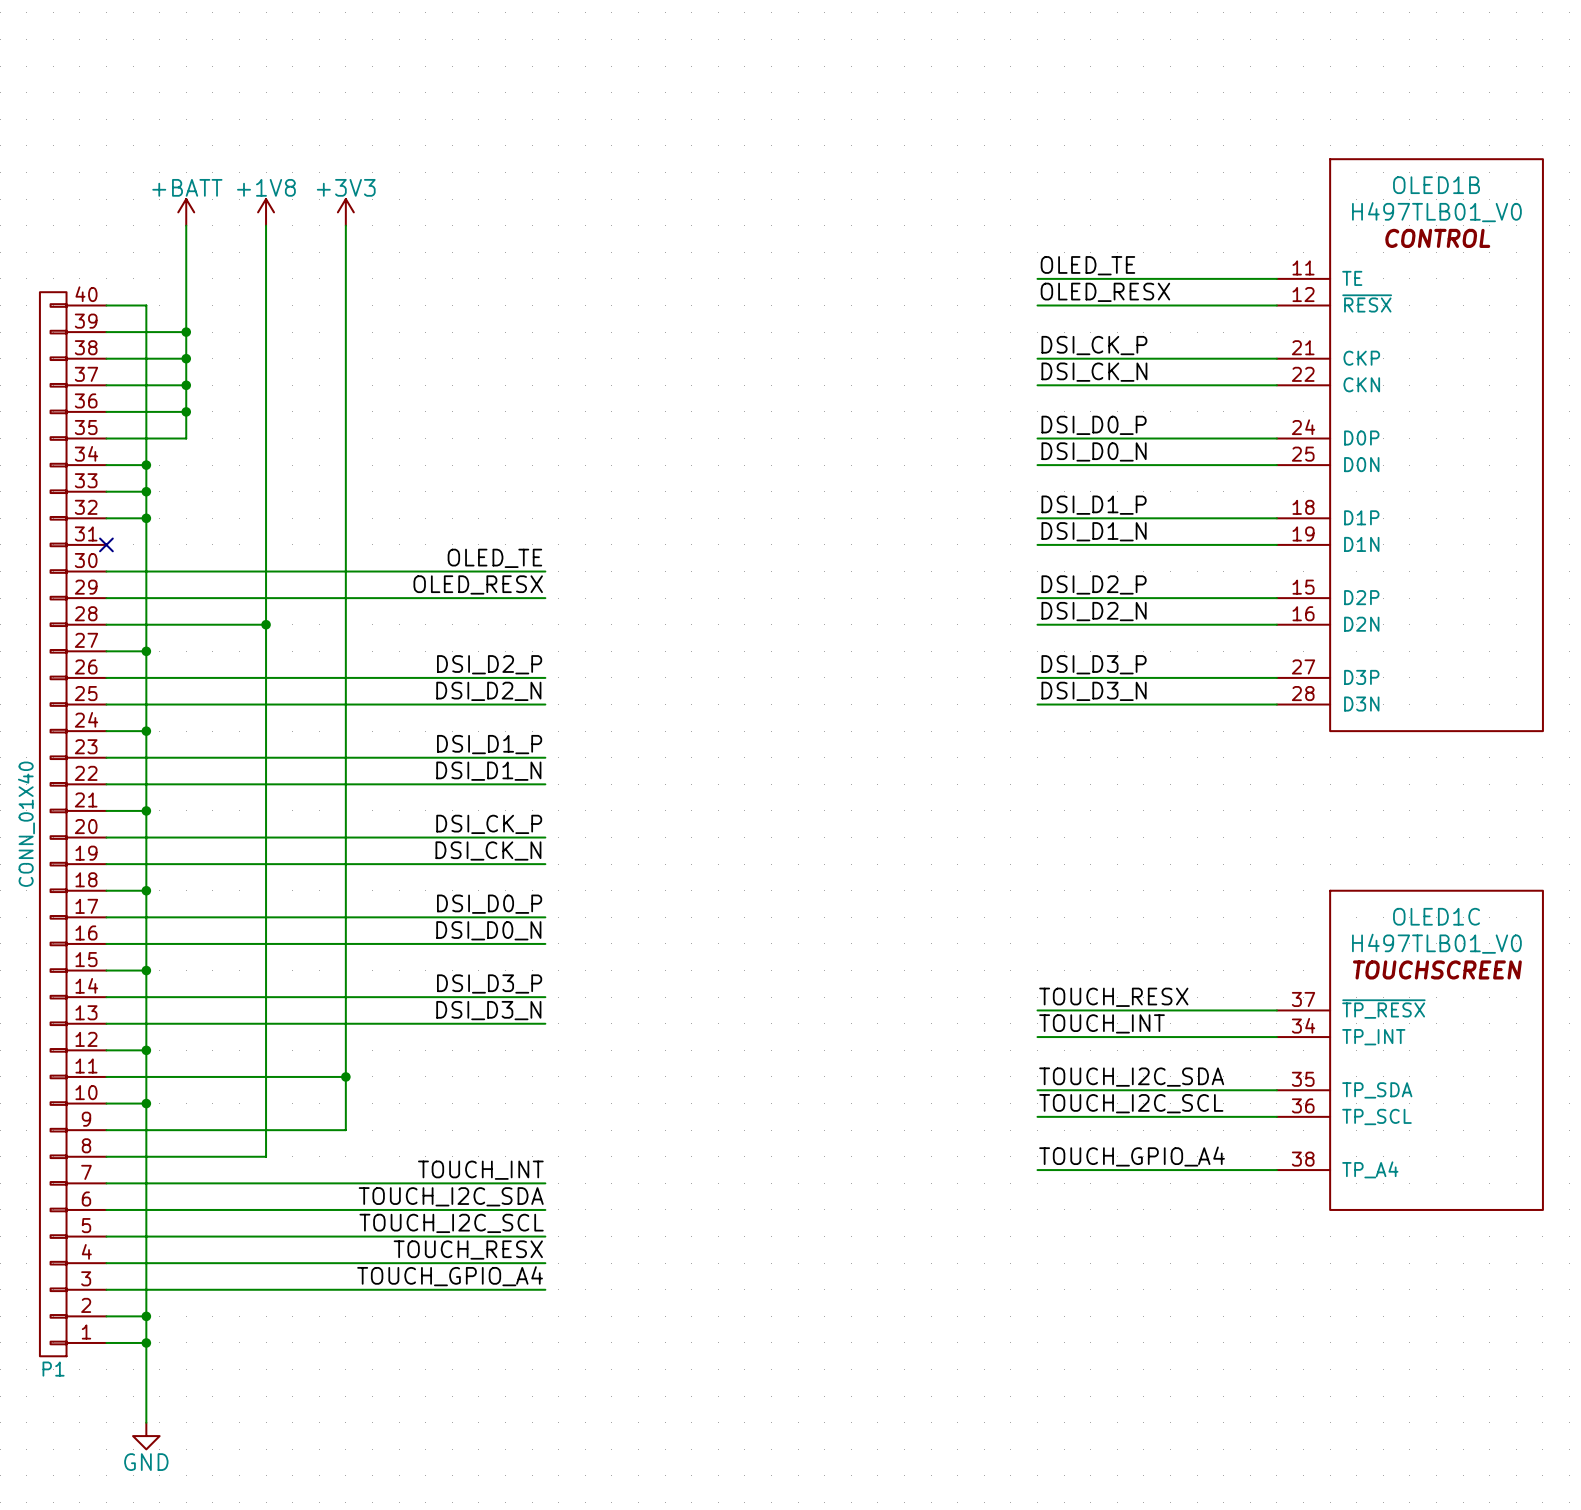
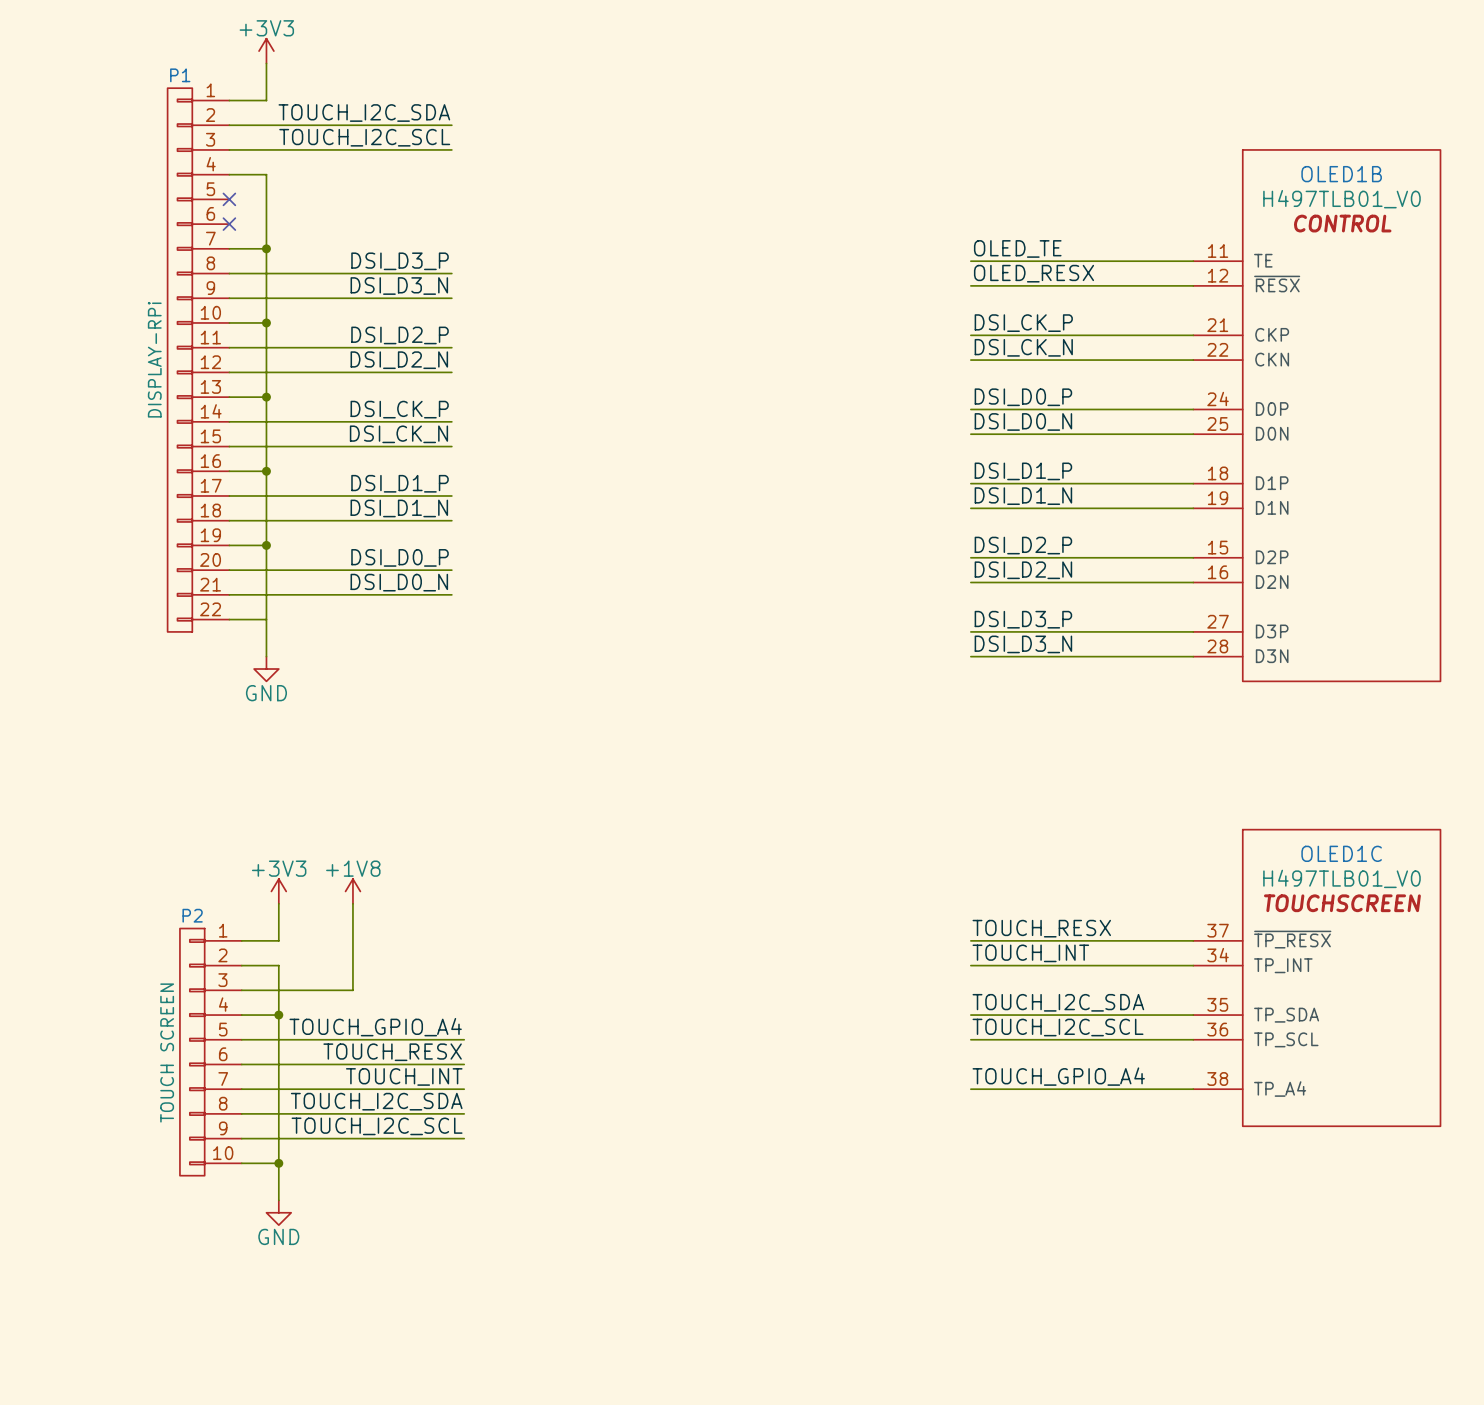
wire: none -> (266, 63) (266, 100) (229, 100)
label: none -> TOUCH_I2C_SDA (364, 113)
wire: none -> (229, 125) (451, 125)
label: none -> TOUCH_I2C_SCL (364, 137)
wire: none -> (229, 149) (451, 149)
wire: none -> (229, 174) (266, 174) (266, 656)
power symbol: +BATT (186, 212) -> none
no-connect mark: none -> (229, 199)
power symbol: +1V8 (266, 212) -> none
power symbol position: +3V3 (345, 212) -> +3V3 (266, 51)
wire: (186, 225) (186, 438) (106, 438) -> none
wire: (266, 225) (266, 1156) (106, 1156) -> none
wire: (345, 225) (345, 1130) (106, 1130) -> none
no-connect mark: none -> (229, 224)
wire: none -> (229, 248) (266, 248)
junction: none -> (266, 248)
label: none -> DSI_D3_P (400, 261)
P1 symbol: [39, 292, 107, 1357] -> [167, 88, 230, 632]
wire: none -> (229, 273) (451, 273)
wire: (106, 305) (146, 305) (146, 1422) -> none
label: none -> DSI_D3_N (399, 286)
wire: none -> (229, 298) (451, 298)
wire: (106, 332) (186, 332) -> none
junction: (186, 332) -> none
junction: none -> (266, 322)
wire: (106, 358) (186, 358) -> none
junction: (186, 358) -> none
label: none -> DSI_D2_P (400, 335)
wire: none -> (229, 347) (451, 347)
wire: (106, 385) (186, 385) -> none
junction: (186, 385) -> none
label: none -> DSI_D2_N (399, 360)
wire: none -> (229, 372) (451, 372)
wire: (106, 411) (186, 411) -> none
junction: (186, 411) -> none
junction: none -> (266, 397)
label: none -> DSI_CK_P (399, 409)
wire: none -> (229, 421) (451, 421)
wire: (106, 465) (146, 465) -> (229, 397) (266, 397)
junction: (146, 465) -> none
label: none -> DSI_CK_N (398, 434)
wire: none -> (229, 446) (451, 446)
wire: (106, 491) (146, 491) -> (229, 322) (266, 322)
junction: (146, 491) -> none
junction: none -> (266, 471)
wire: (106, 518) (146, 518) -> none
junction: (146, 518) -> none
wire: none -> (229, 495) (451, 495)
no-connect mark: (106, 544) -> none
wire: none -> (229, 520) (451, 520)
label: OLED_TE (494, 558) -> none
wire: (106, 571) (545, 571) -> none
label: OLED_RESX (478, 584) -> none
wire: (106, 598) (545, 598) -> none
label: none -> DSI_D0_P (400, 557)
wire: none -> (229, 570) (451, 570)
wire: (106, 624) (266, 624) -> none
junction position: (266, 624) -> (266, 545)
label: none -> DSI_D0_N (399, 582)
wire: none -> (229, 594) (451, 594)
wire: (106, 651) (146, 651) -> (229, 471) (266, 471)
junction: (146, 651) -> none
label: DSI_D2_P (489, 664) -> none
wire: (106, 677) (545, 677) -> none
label: DSI_D2_N (488, 691) -> none
wire: (106, 704) (545, 704) -> none
power symbol: none -> GND (266, 669)
wire: (106, 731) (146, 731) -> (229, 545) (266, 545)
junction: (146, 731) -> none
label position: DSI_D1_P (489, 744) -> DSI_D1_P (400, 483)
wire: (106, 757) (545, 757) -> none
label position: DSI_D1_N (488, 771) -> DSI_D1_N (399, 508)
wire: (106, 784) (545, 784) -> none
wire: (106, 810) (146, 810) -> (229, 619) (266, 619)
junction: (146, 810) -> none
P1 value: CONN_01X40 (26, 824) -> DISPLAY-RPi (154, 359)
label: DSI_CK_P (489, 824) -> none
wire: (106, 837) (545, 837) -> none
label: DSI_CK_N (488, 850) -> none
wire: (106, 864) (545, 864) -> none
wire: (106, 890) (146, 890) -> none
junction: (146, 890) -> none
label: DSI_D0_P (489, 904) -> none
wire: (106, 917) (545, 917) -> none
label: DSI_D0_N (488, 930) -> none
wire: (106, 943) (545, 943) -> none
power symbol: none -> +3V3 (278, 891)
power symbol: none -> +1V8 (352, 891)
wire: (106, 970) (146, 970) -> none
junction: (146, 970) -> none
wire: none -> (278, 903) (278, 940) (241, 940)
wire: none -> (352, 903) (352, 990) (241, 990)
label: DSI_D3_P (489, 983) -> none
wire: (106, 997) (545, 997) -> none
label: DSI_D3_N (488, 1010) -> none
wire: (106, 1023) (545, 1023) -> none
wire: none -> (241, 965) (278, 965) (278, 1200)
wire: (106, 1050) (146, 1050) -> (241, 1015) (278, 1015)
junction: (146, 1050) -> none
wire: (106, 1076) (345, 1076) -> (241, 1039) (464, 1039)
junction position: (345, 1076) -> (278, 1015)
wire: (106, 1103) (146, 1103) -> (241, 1163) (278, 1163)
junction: (146, 1103) -> none
P2: none -> TOUCH SCREEN (210, 1052)
wire: none -> (241, 1064) (464, 1064)
wire: none -> (241, 1089) (464, 1089)
label position: TOUCH_INT (480, 1170) -> TOUCH_INT (404, 1076)
wire: (106, 1183) (545, 1183) -> none
wire: none -> (241, 1113) (464, 1113)
label position: TOUCH_I2C_SDA (451, 1196) -> TOUCH_I2C_SDA (376, 1101)
wire: (106, 1209) (545, 1209) -> none
wire: none -> (241, 1138) (464, 1138)
label position: TOUCH_I2C_SCL (451, 1223) -> TOUCH_I2C_SCL (377, 1126)
wire: (106, 1236) (545, 1236) -> none
junction: none -> (278, 1163)
label position: TOUCH_RESX (468, 1250) -> TOUCH_RESX (392, 1052)
wire: (106, 1263) (545, 1263) -> none
label position: TOUCH_GPIO_A4 (450, 1276) -> TOUCH_GPIO_A4 (375, 1027)
wire: (106, 1289) (545, 1289) -> none
wire: (106, 1316) (146, 1316) -> none
junction: (146, 1316) -> none
wire: (106, 1342) (146, 1342) -> none
junction: (146, 1342) -> none
P1 name position: P1 (53, 1369) -> P1 (180, 75)
power symbol position: GND (146, 1436) -> GND (278, 1212)

